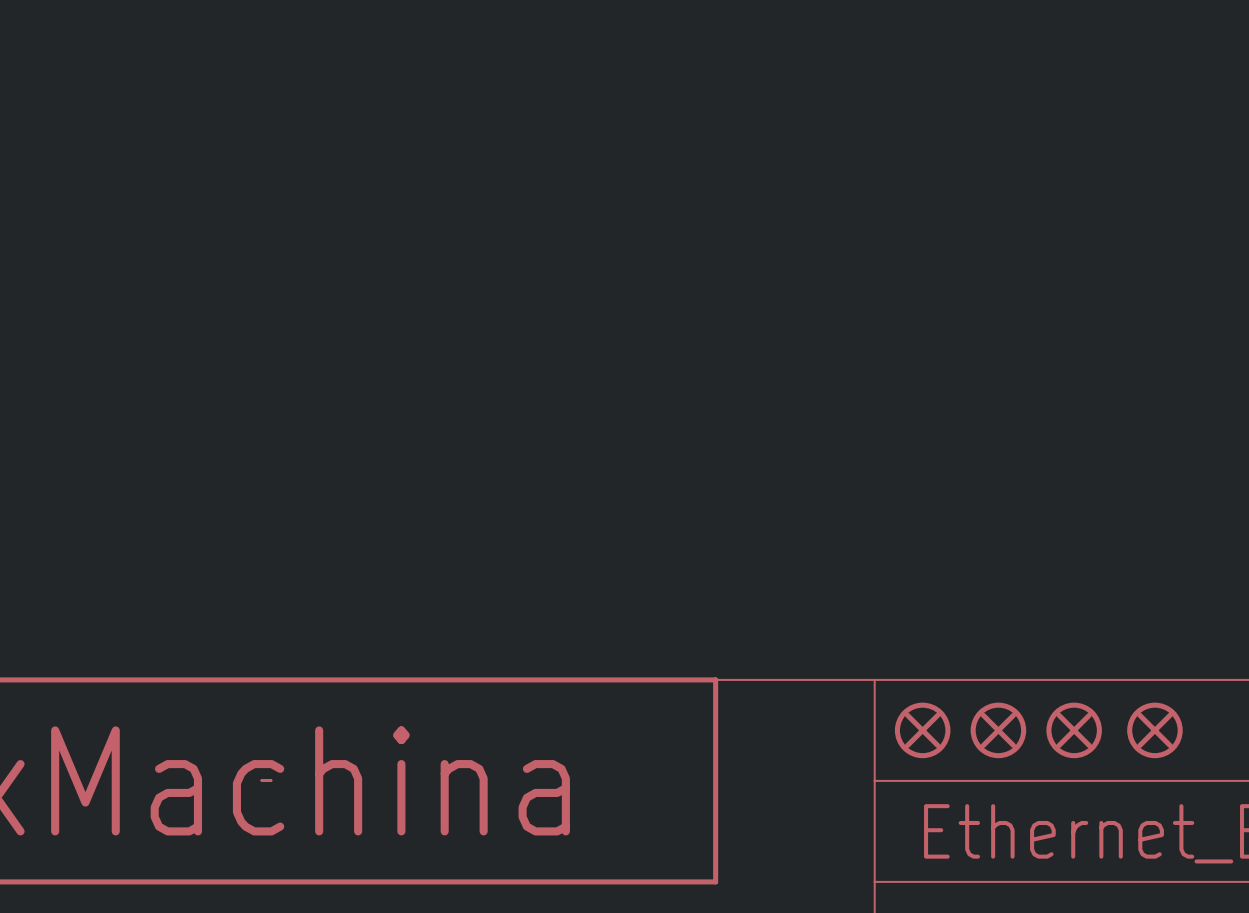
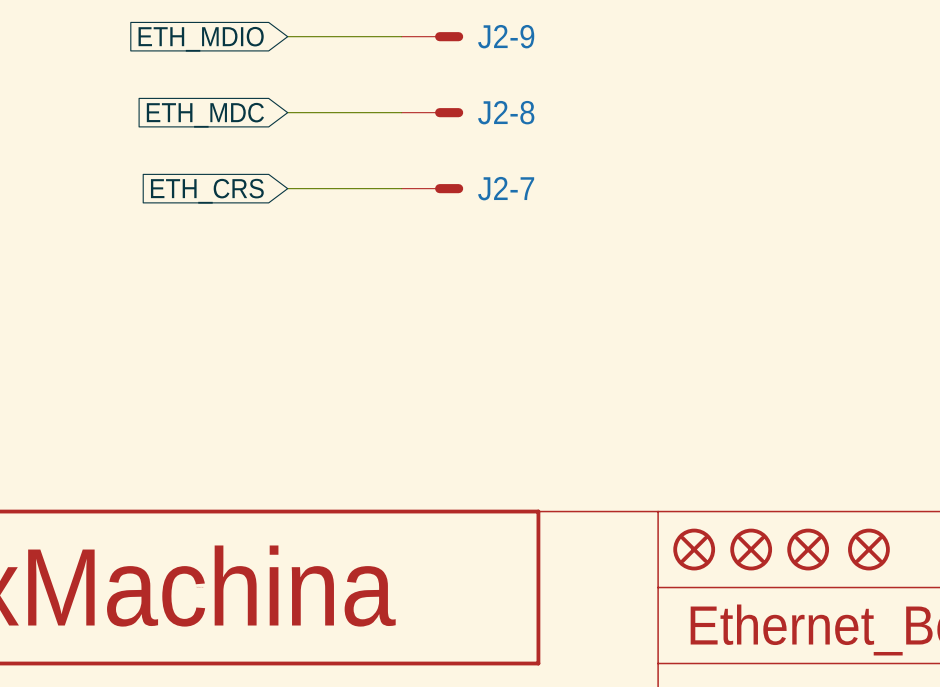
wire: none -> (287, 36) (401, 36)
J2-9: none -> (432, 36)
global label: none -> ETH_MDIO (201, 39)
wire: none -> (287, 112) (401, 112)
J2-8: none -> (432, 112)
global label: none -> ETH_MDC (205, 115)
wire: none -> (287, 188) (401, 188)
J2-7: none -> (432, 188)
global label: none -> ETH_CRS (207, 191)

